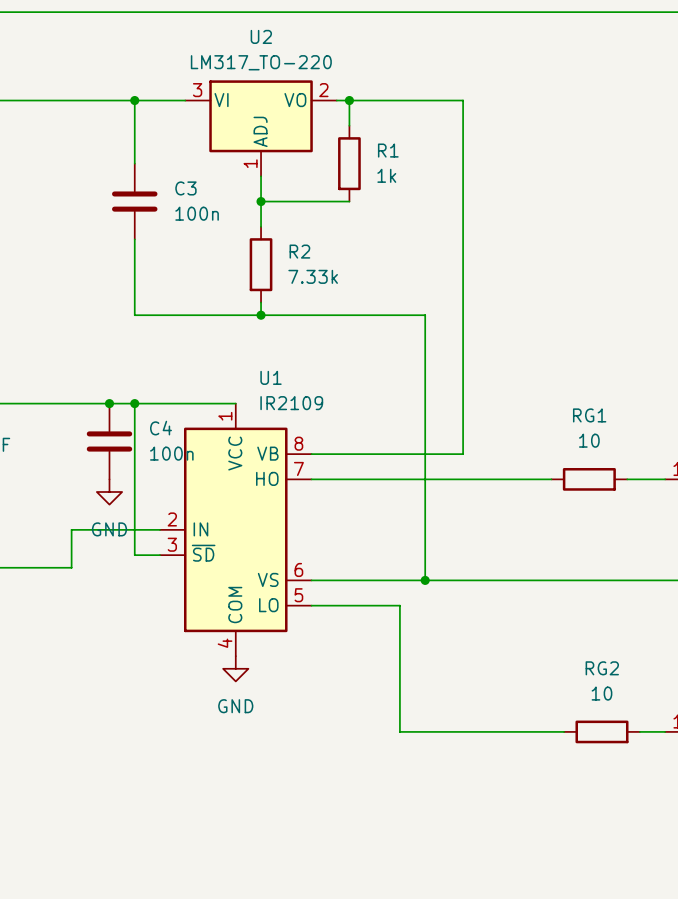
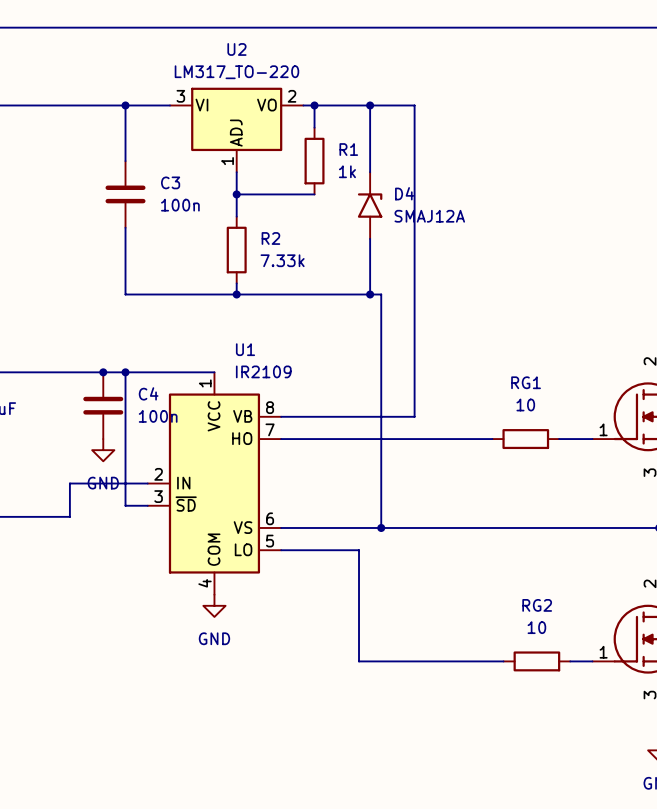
wire: none -> (370, 105) (370, 172)
junction: none -> (370, 105)
D4: none -> SMAJ12A (370, 205)
wire: none -> (370, 238) (370, 294)
junction: none -> (370, 294)

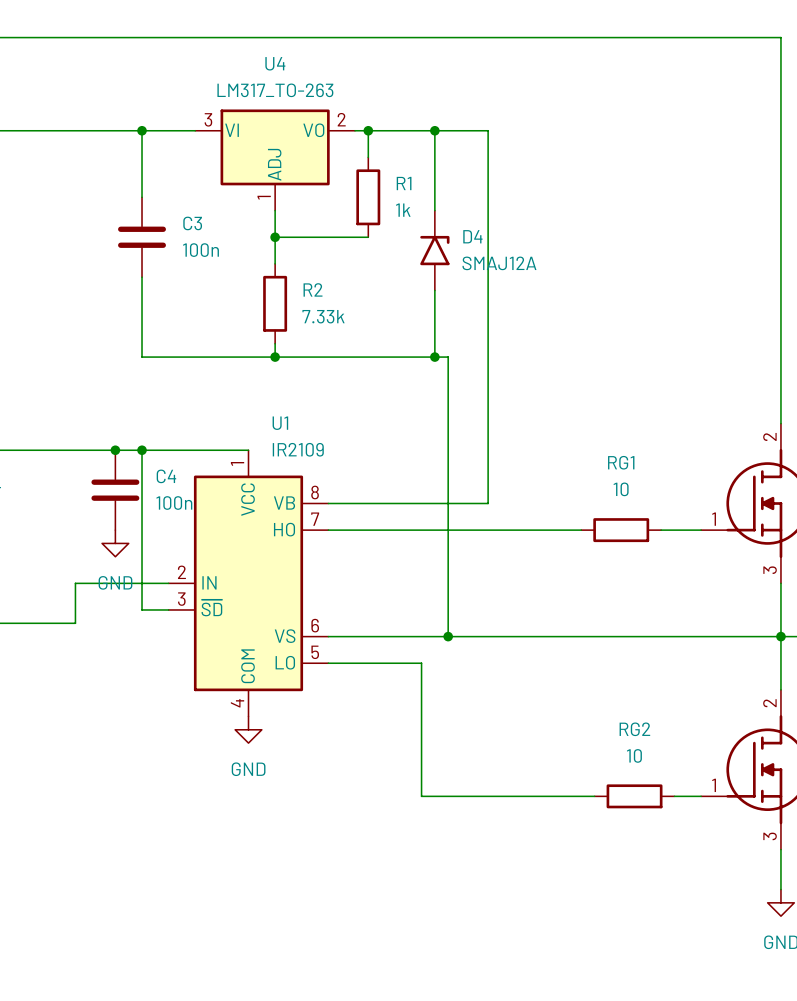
U2 name: U2 (236, 49) -> U4 (275, 63)
U2 value: LM317_TO-220 (236, 72) -> LM317_TO-263 (275, 90)

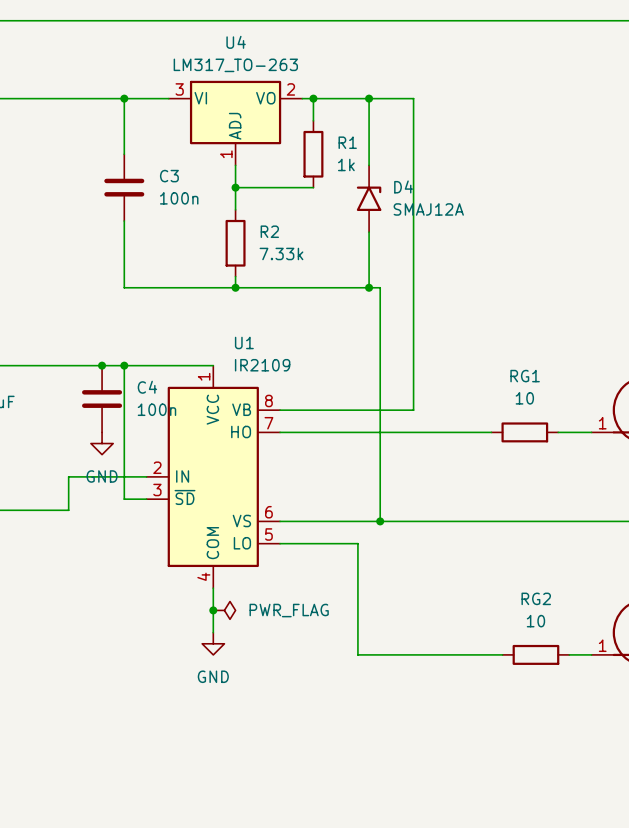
wire: none -> (213, 588) (213, 632)
power symbol position: GND (248, 729) -> GND (213, 643)
junction: none -> (213, 610)
power symbol: none -> PWR_FLAG (224, 610)

